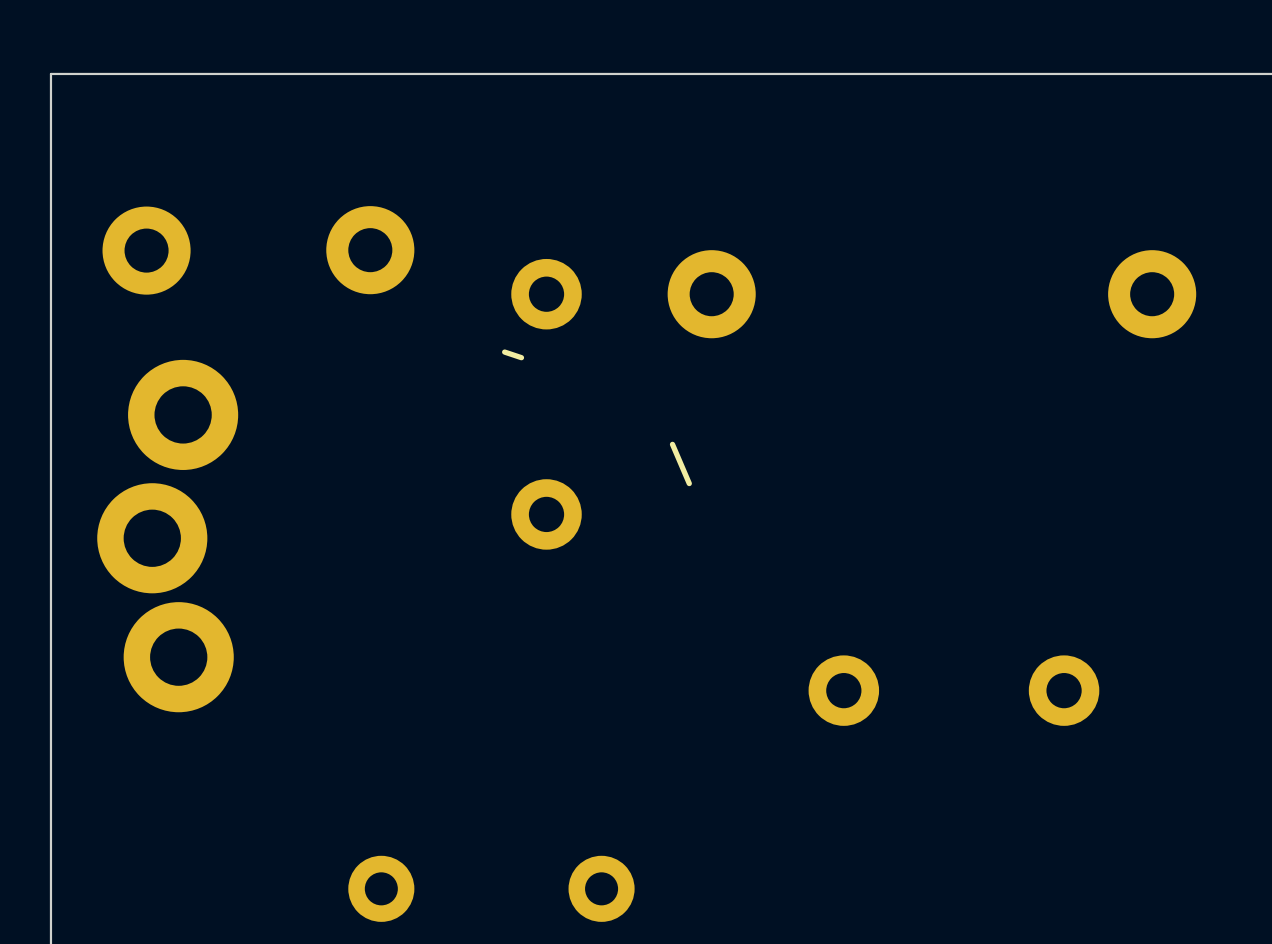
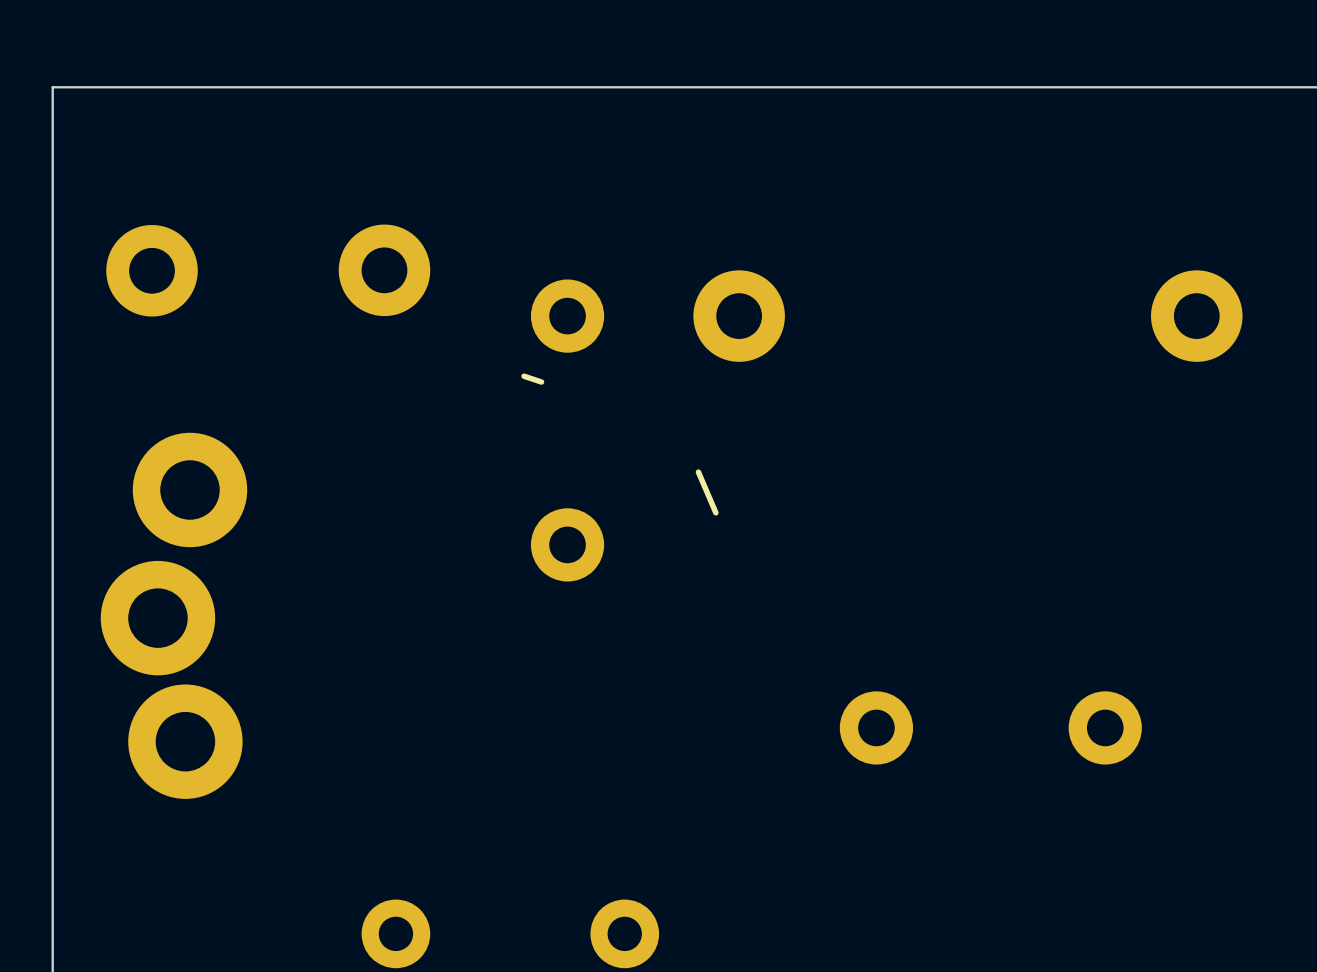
part position: (167, 536) -> (173, 615)

